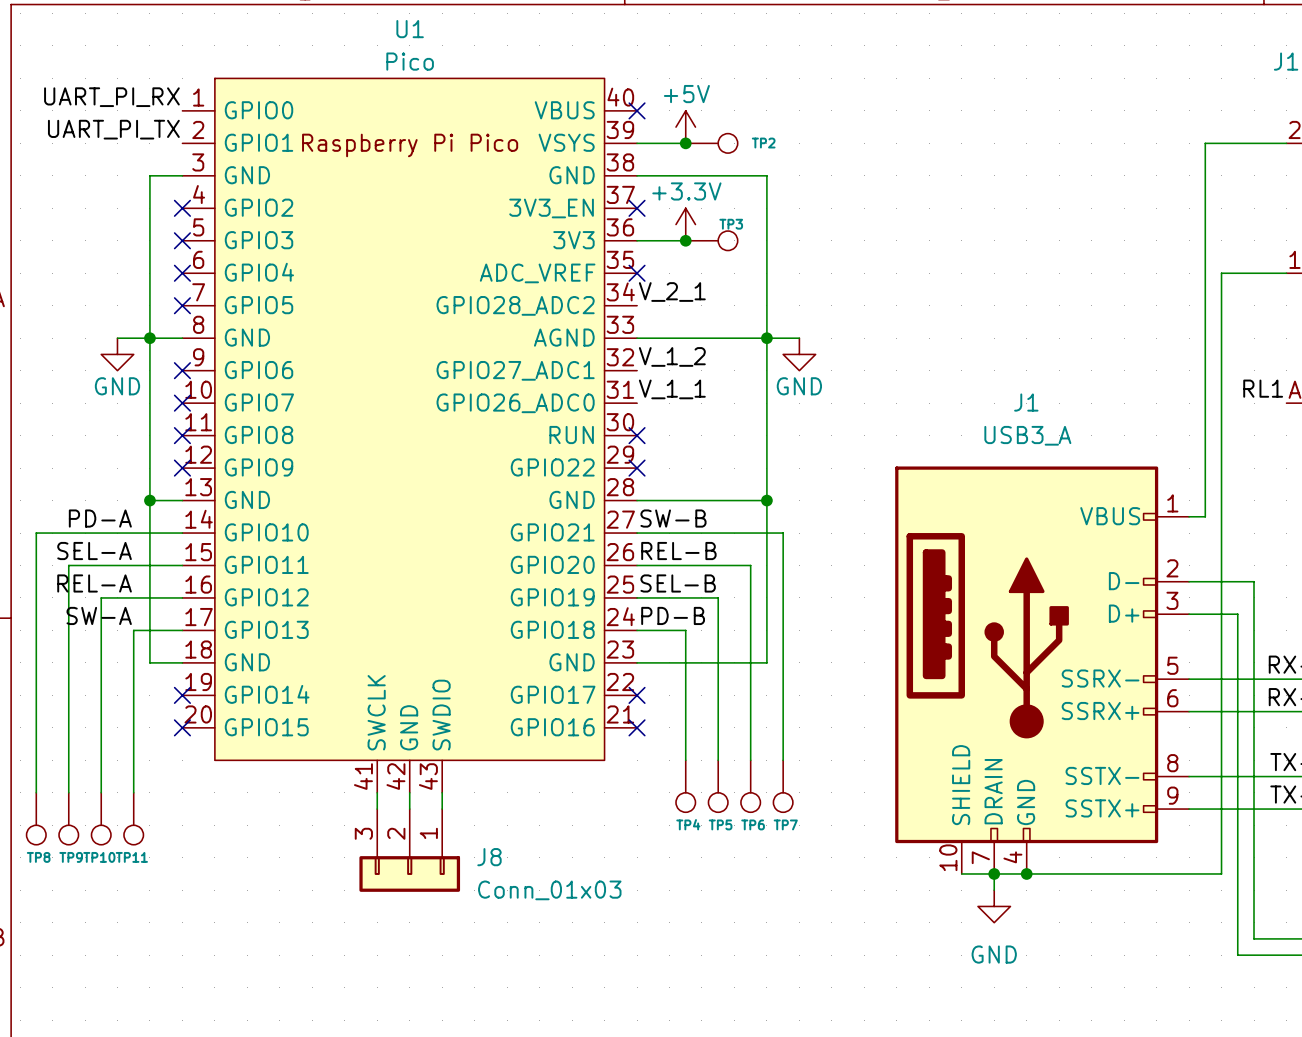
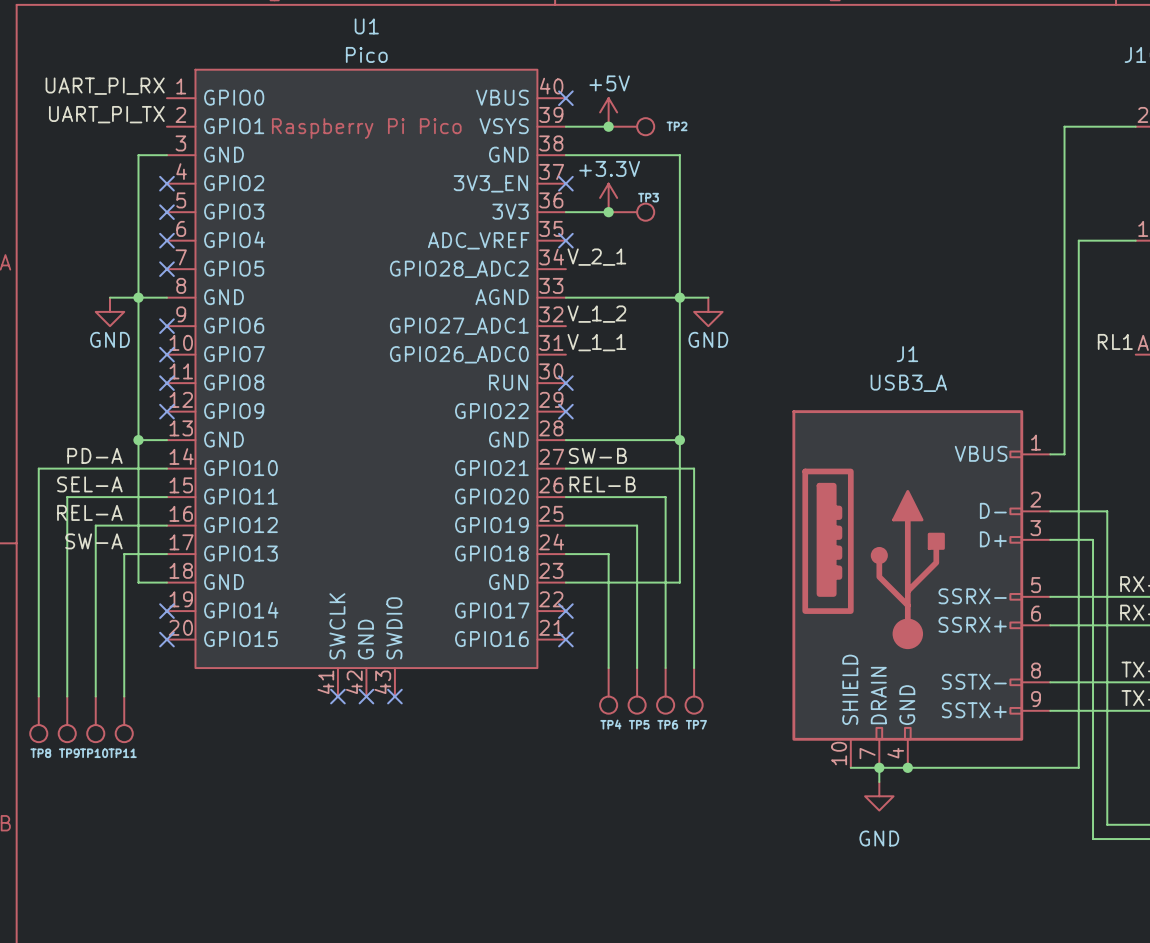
label: SEL-B (678, 583) -> none
label: PD-B (673, 615) -> none
wire: (377, 792) (377, 809) -> none
no-connect mark: none -> (337, 696)
wire: (409, 792) (409, 809) -> none
no-connect mark: none -> (366, 696)
wire: (442, 792) (442, 809) -> none
no-connect mark: none -> (394, 696)
J8: Conn_01x03 (409, 850) -> none

